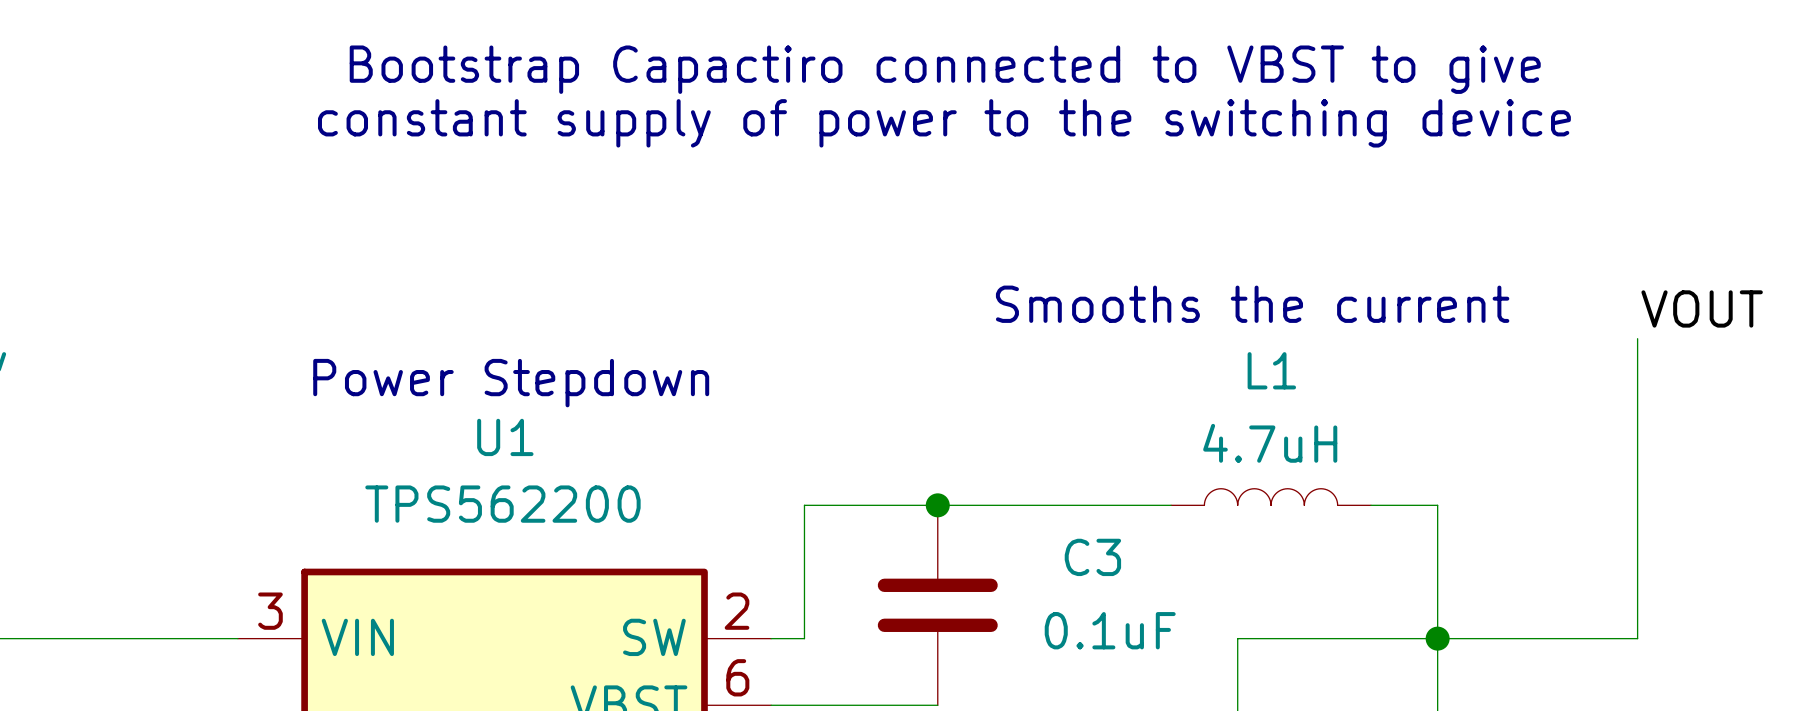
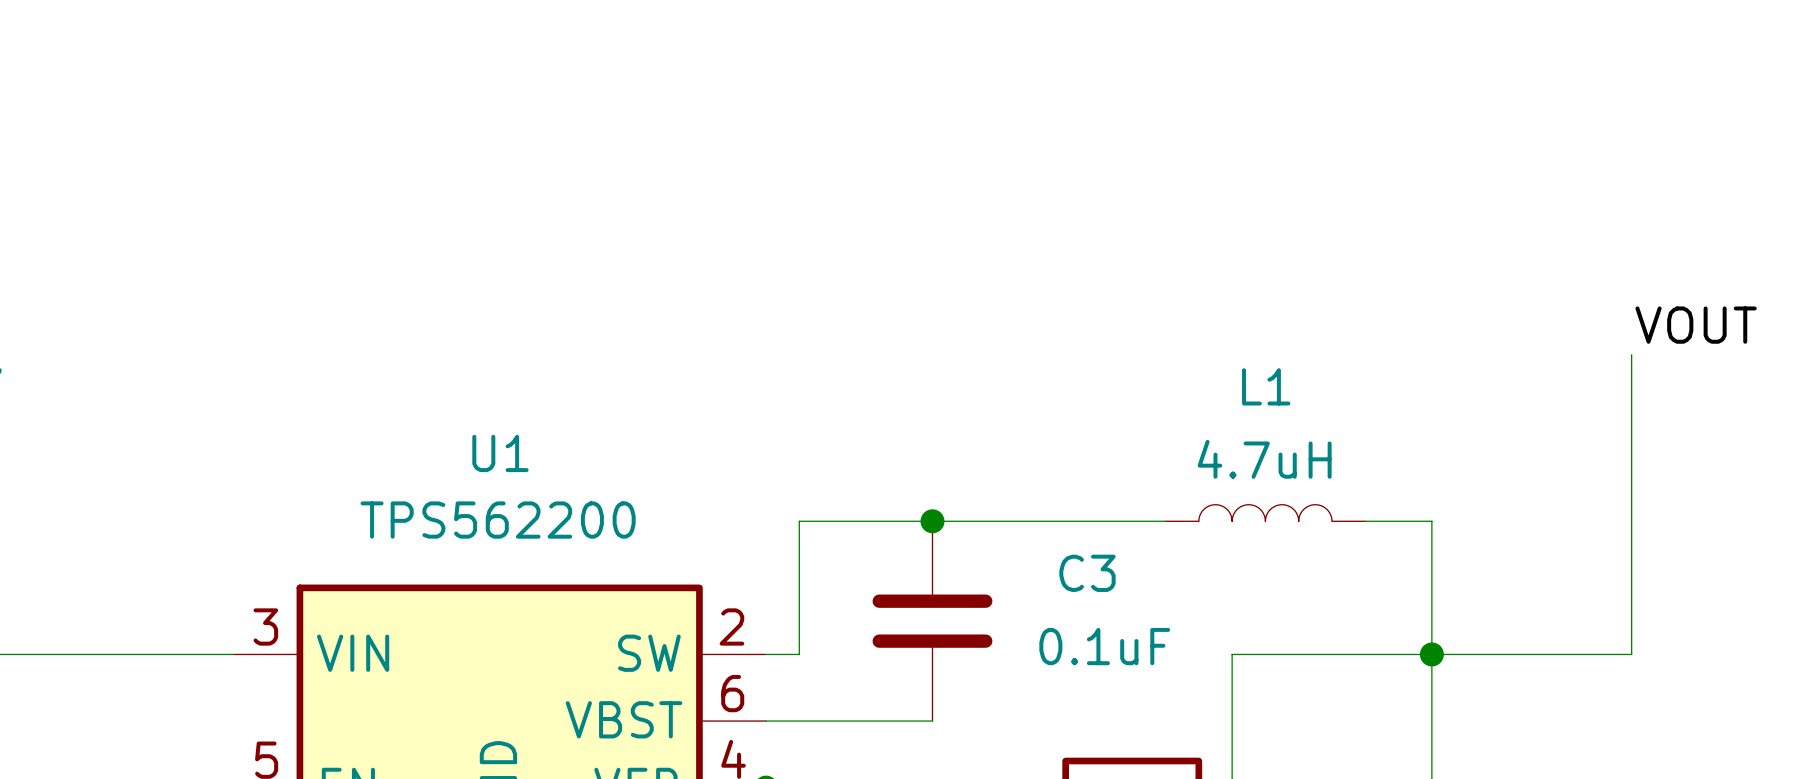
text: Bootstrap Capactiro connected to VBST to give (945, 69) -> none
text: constant supply of power to the switching device (944, 123) -> none
text: Smooths the current (1252, 304) -> none
text: Power Stepdown (511, 383) -> none

